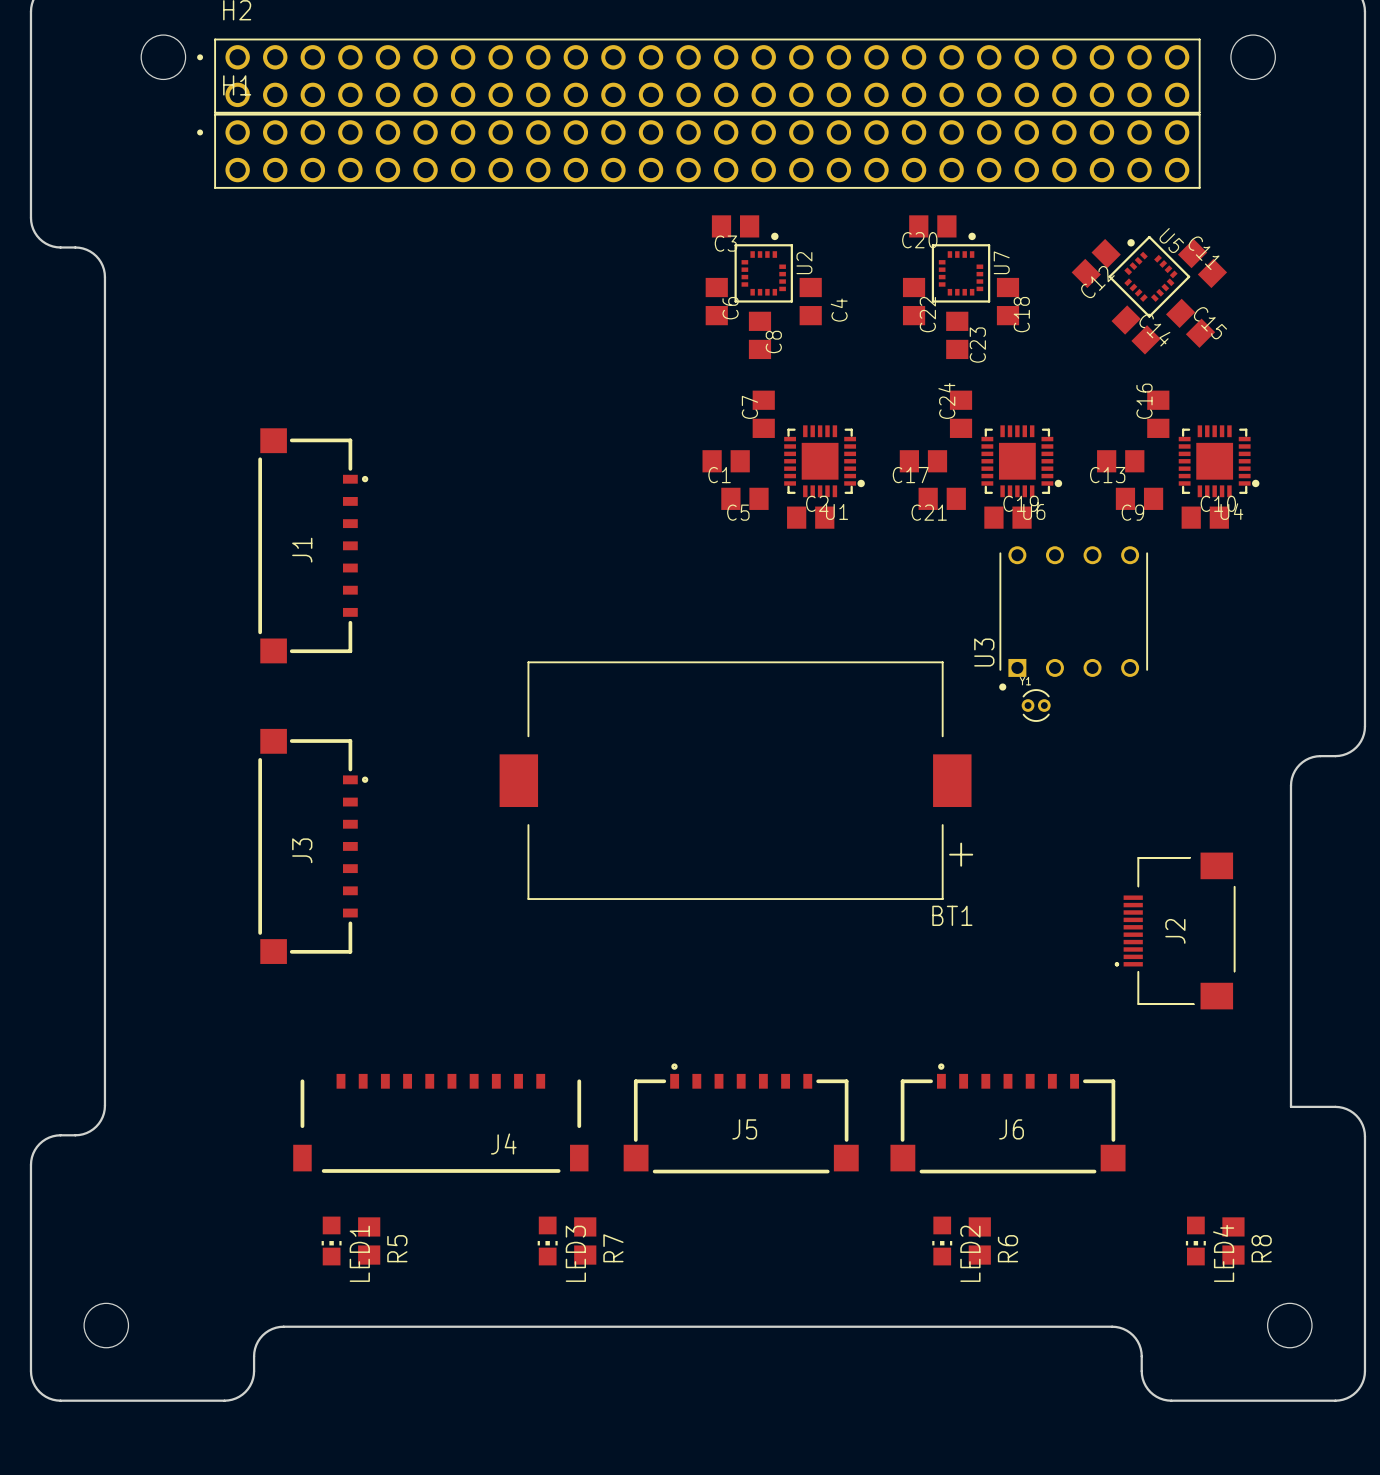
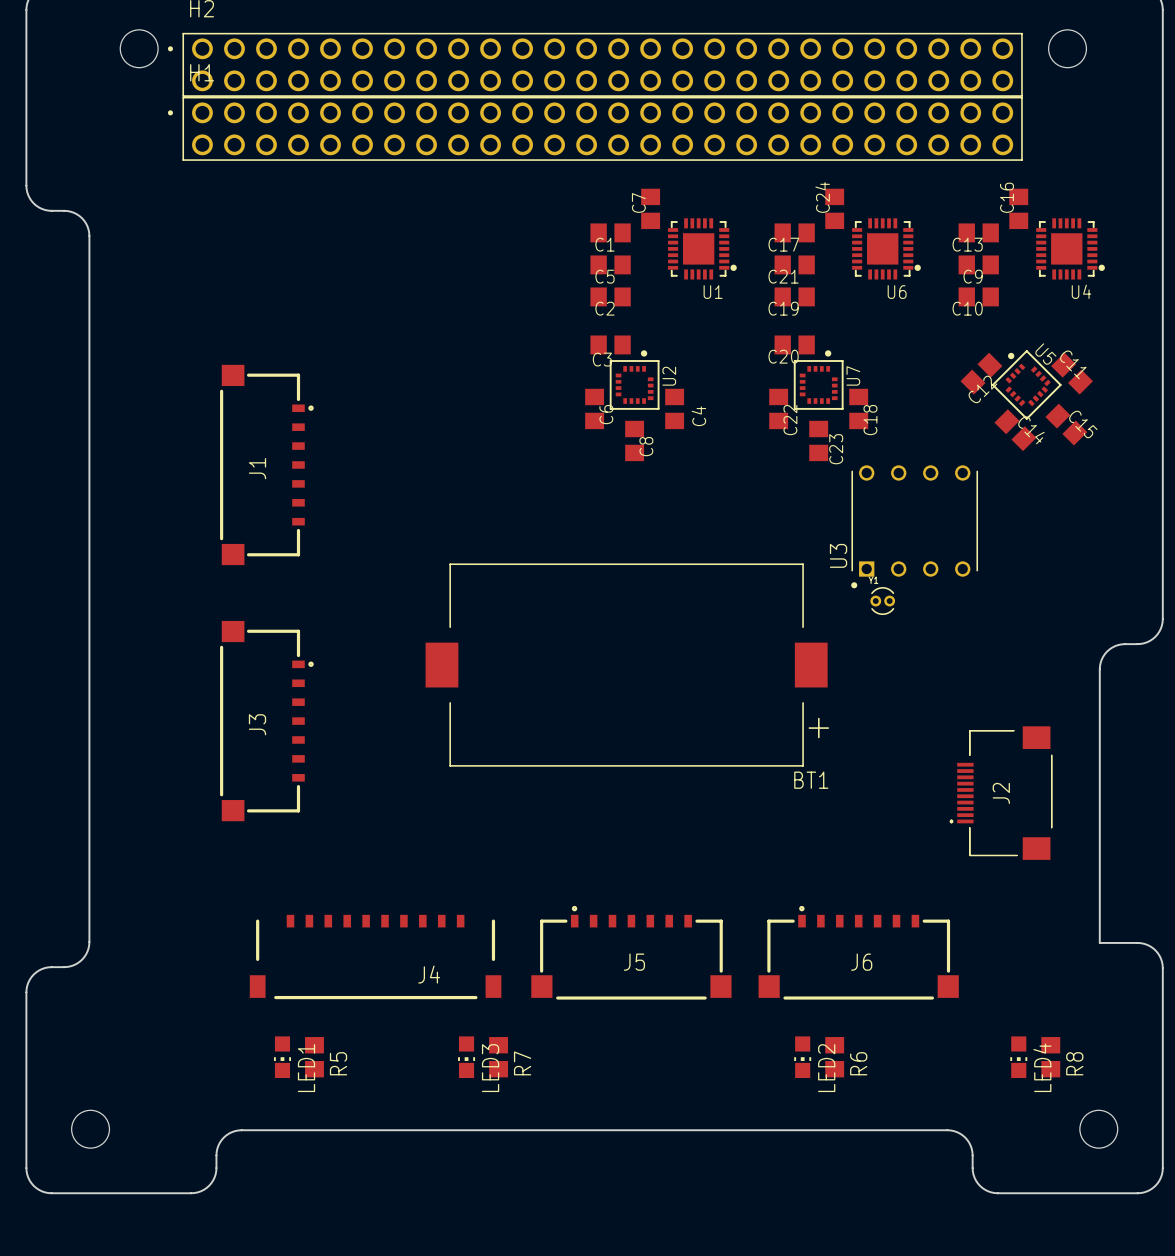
C3 position: (735, 226) -> (610, 344)
C20 position: (932, 226) -> (794, 344)
C12 position: (1096, 263) -> (981, 373)
C11 position: (1202, 263) -> (1072, 373)
U2 position: (763, 267) -> (634, 380)
U7 position: (961, 267) -> (818, 380)
U5 position: (1149, 276) -> (1026, 384)
C6 position: (716, 301) -> (594, 408)
C4 position: (810, 301) -> (674, 408)
C22 position: (914, 301) -> (778, 408)
C18 position: (1007, 301) -> (858, 408)
C15 position: (1190, 323) -> (1066, 424)
C14 position: (1136, 329) -> (1015, 430)
C8 position: (759, 335) -> (634, 440)
C23 position: (957, 335) -> (818, 440)
C7 position: (763, 414) -> (650, 208)
C24 position: (961, 414) -> (834, 208)
C16 position: (1158, 414) -> (1018, 208)
C1 position: (726, 461) -> (610, 232)
U1 position: (824, 461) -> (702, 248)
C17 position: (923, 461) -> (794, 232)
U6 position: (1021, 461) -> (886, 248)
C13 position: (1120, 461) -> (978, 232)
U4 position: (1219, 461) -> (1070, 248)
C5 position: (744, 498) -> (610, 264)
C21 position: (942, 498) -> (794, 264)
C9 position: (1139, 498) -> (978, 264)
C2 name position: C2 (817, 503) -> C2 (604, 308)
C19 name position: C19 (1021, 503) -> C19 (783, 308)
C10 name position: C10 (1218, 503) -> C10 (967, 308)
C2 position: (810, 517) -> (610, 296)
C19 position: (1007, 517) -> (794, 296)
C10 position: (1205, 517) -> (978, 296)

